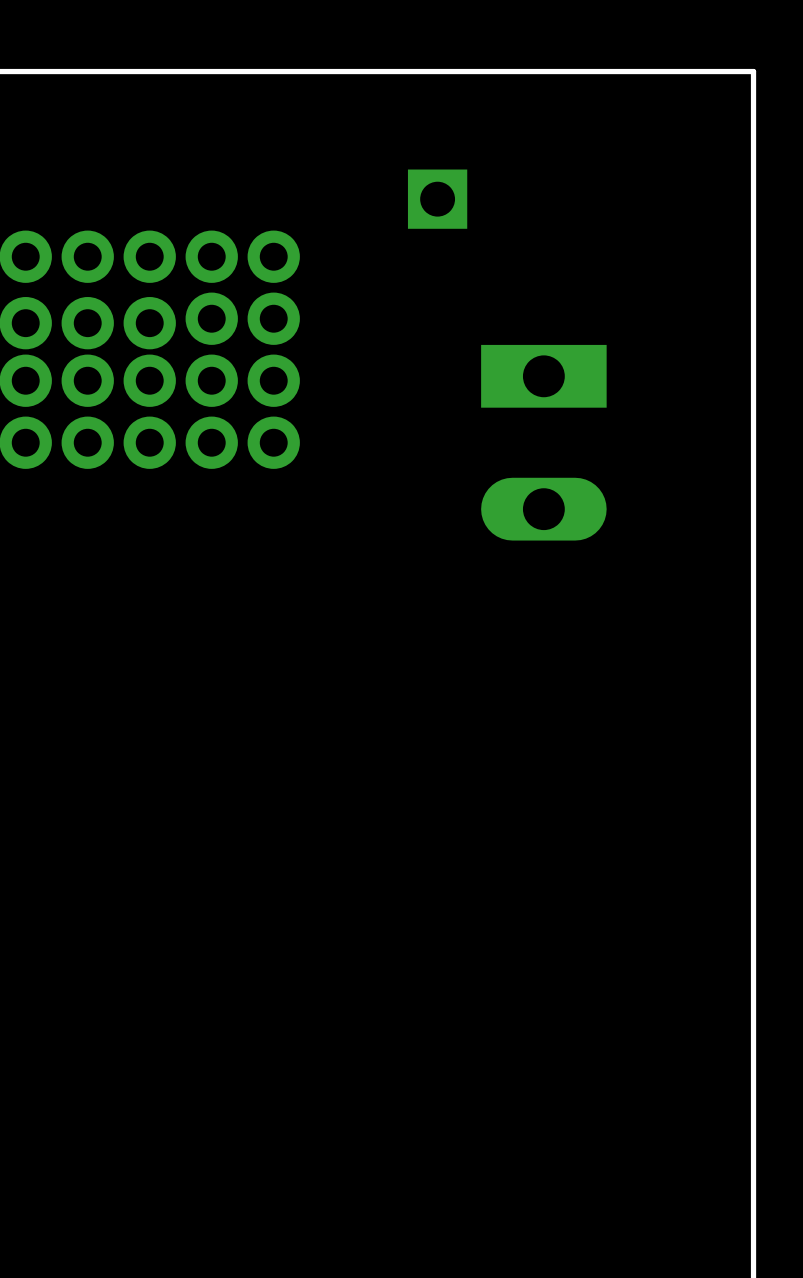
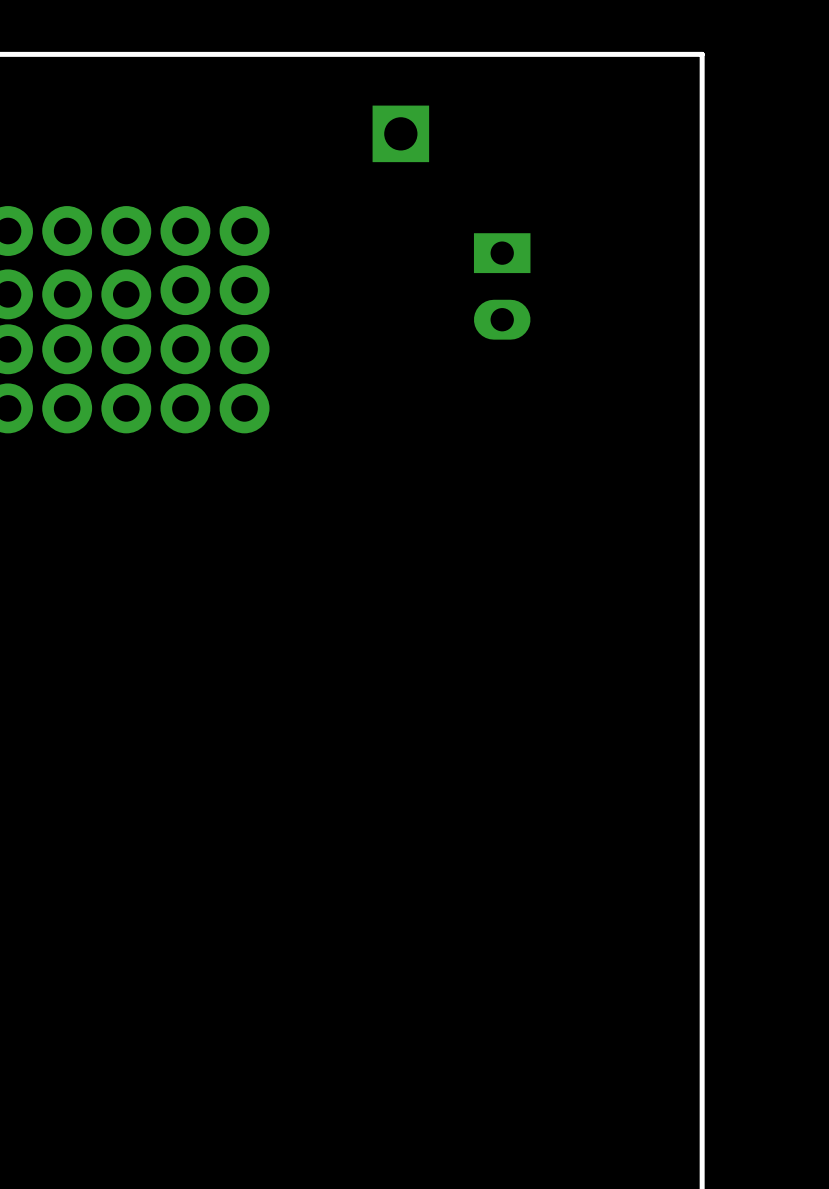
part position: (437, 199) -> (400, 133)
part: none -> (502, 286)
part: (543, 442) -> none

